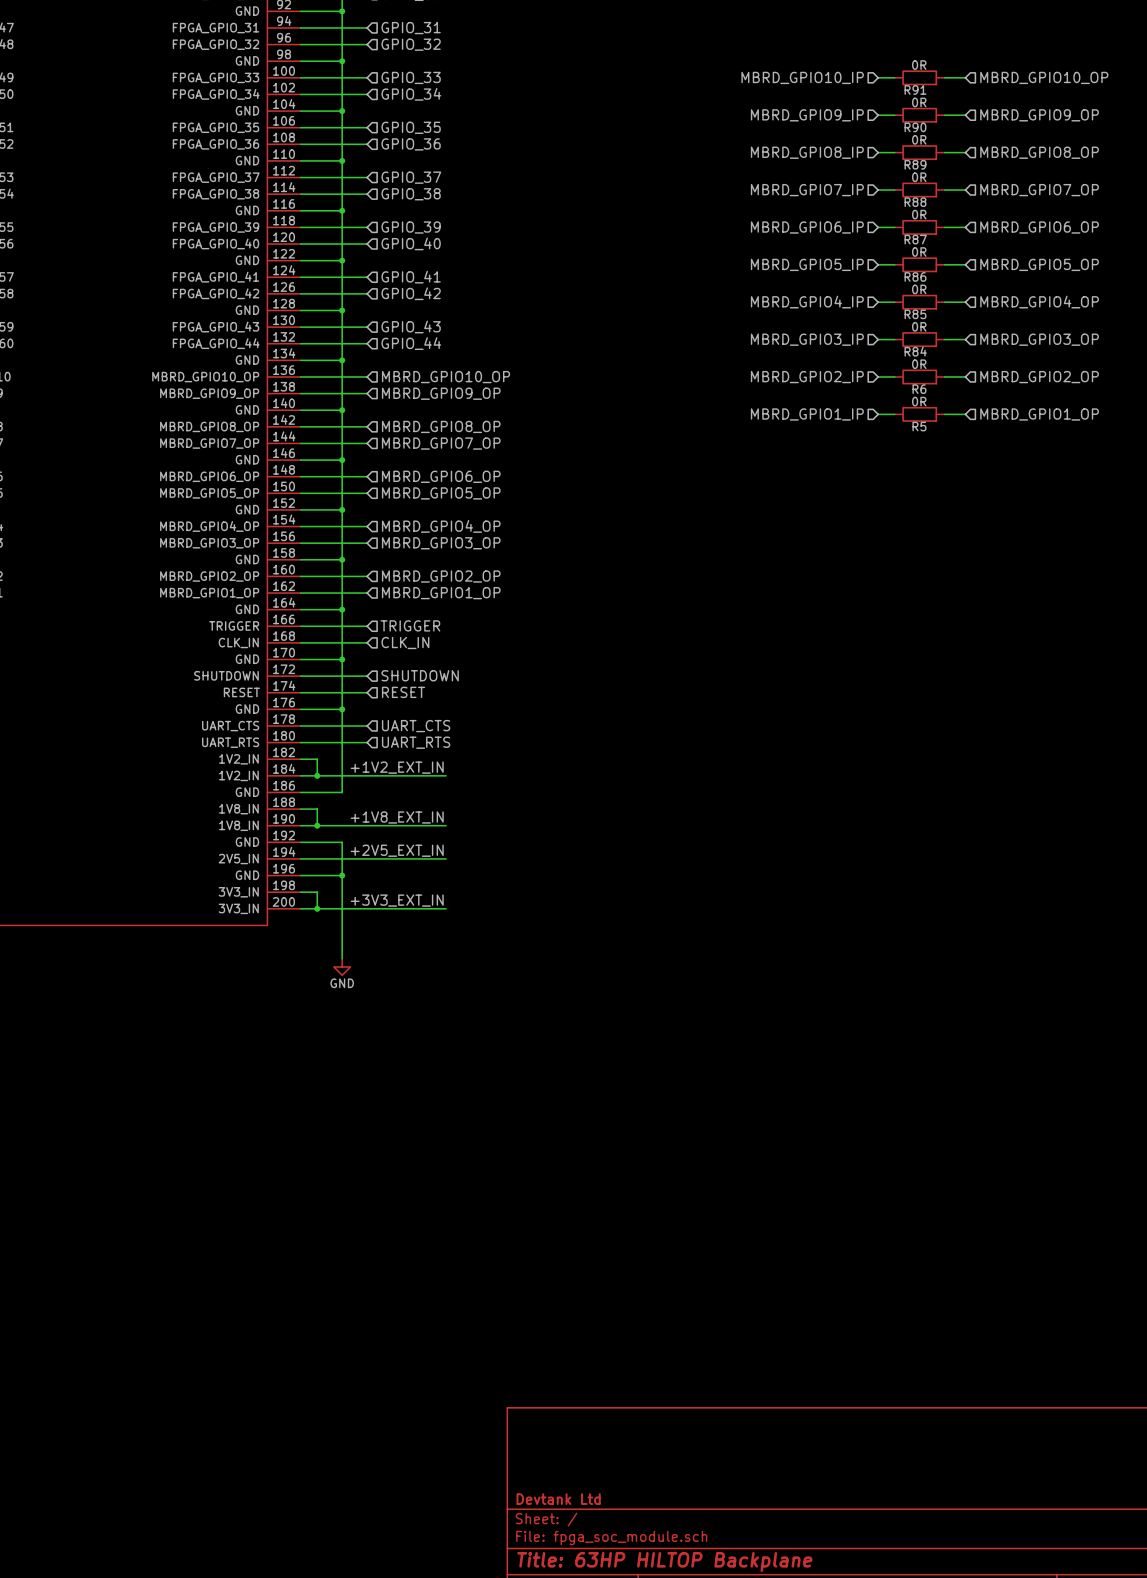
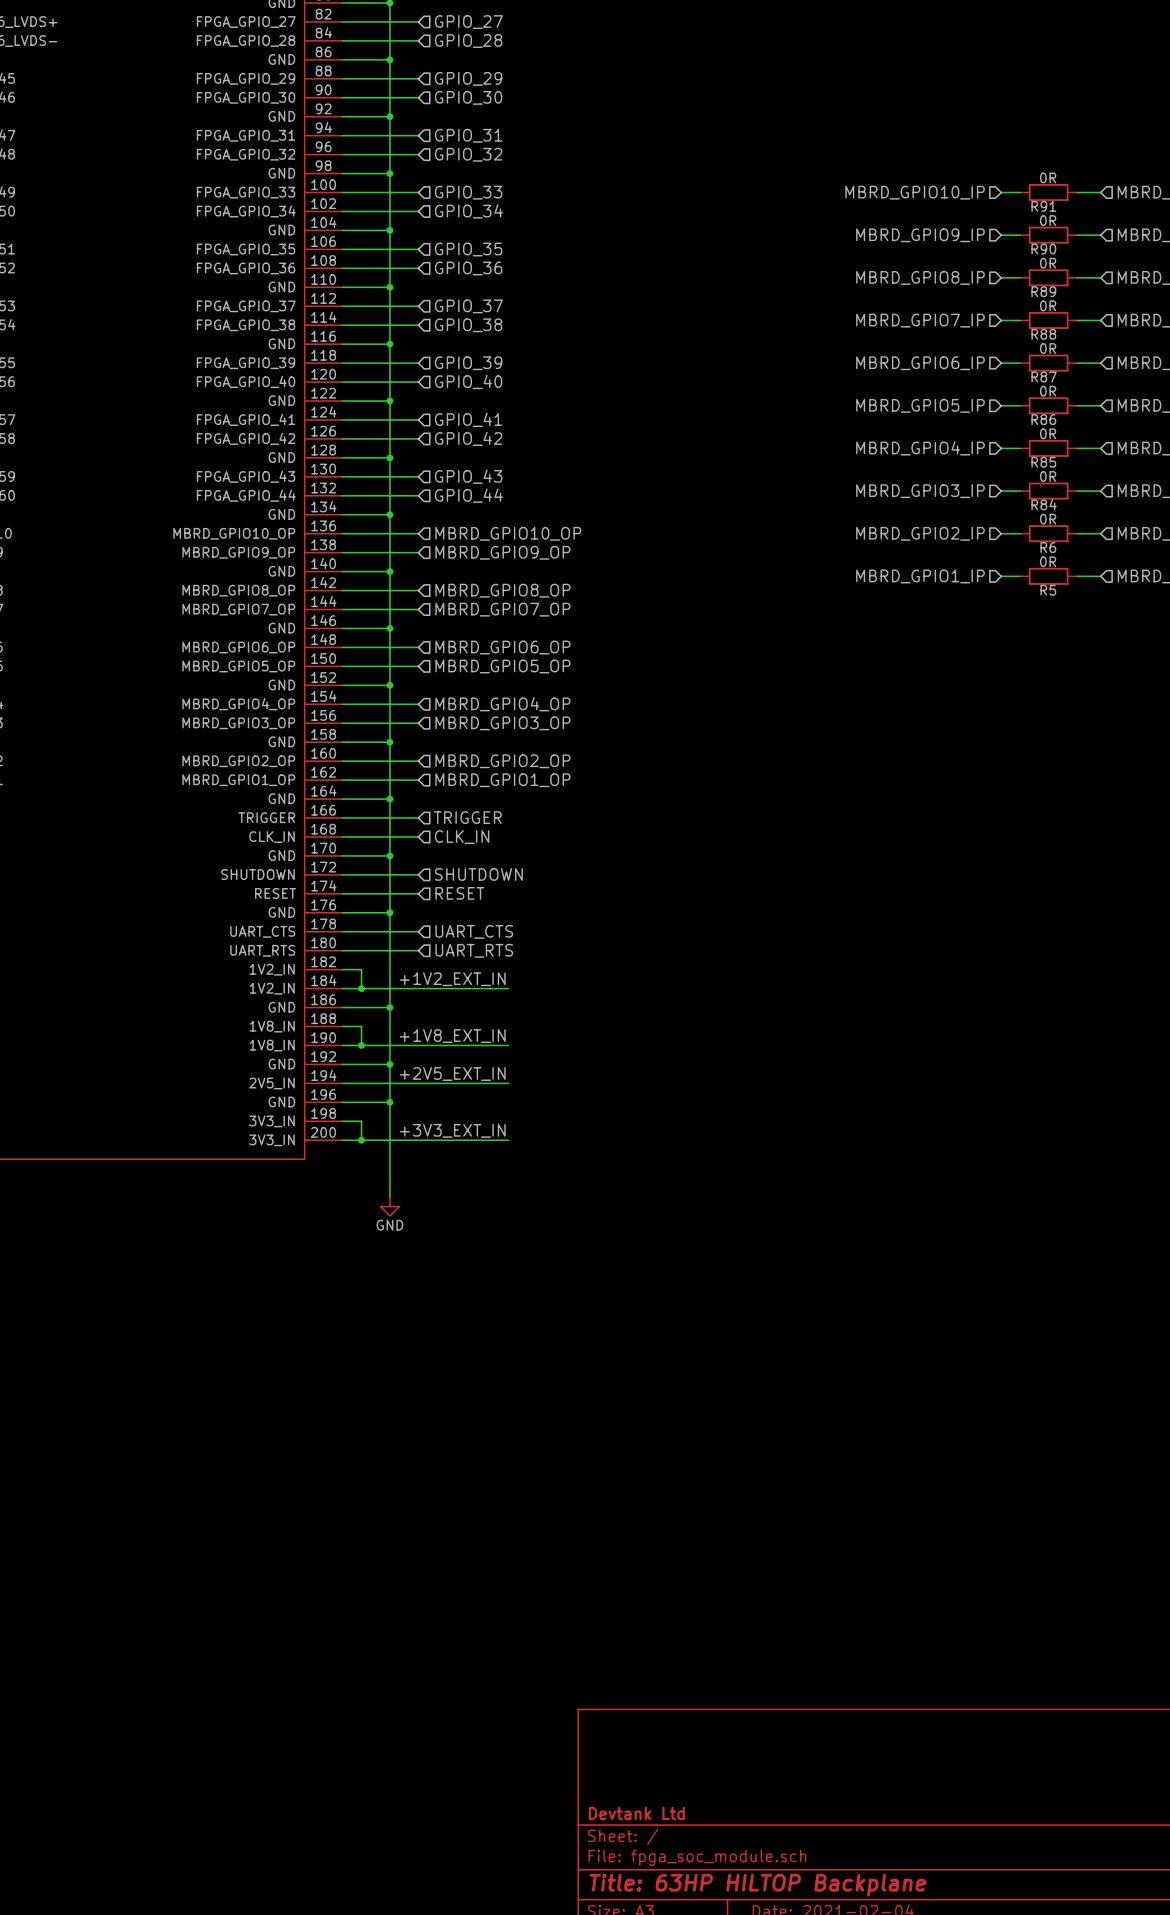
wire: none -> (389, 1007) (389, 1064)
junction: none -> (389, 1007)
junction: none -> (389, 1064)

